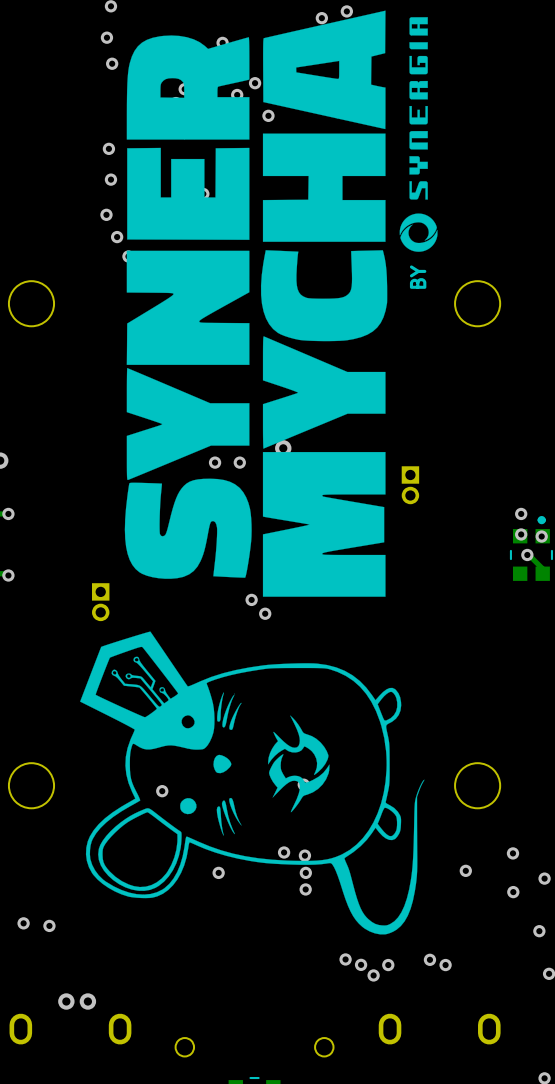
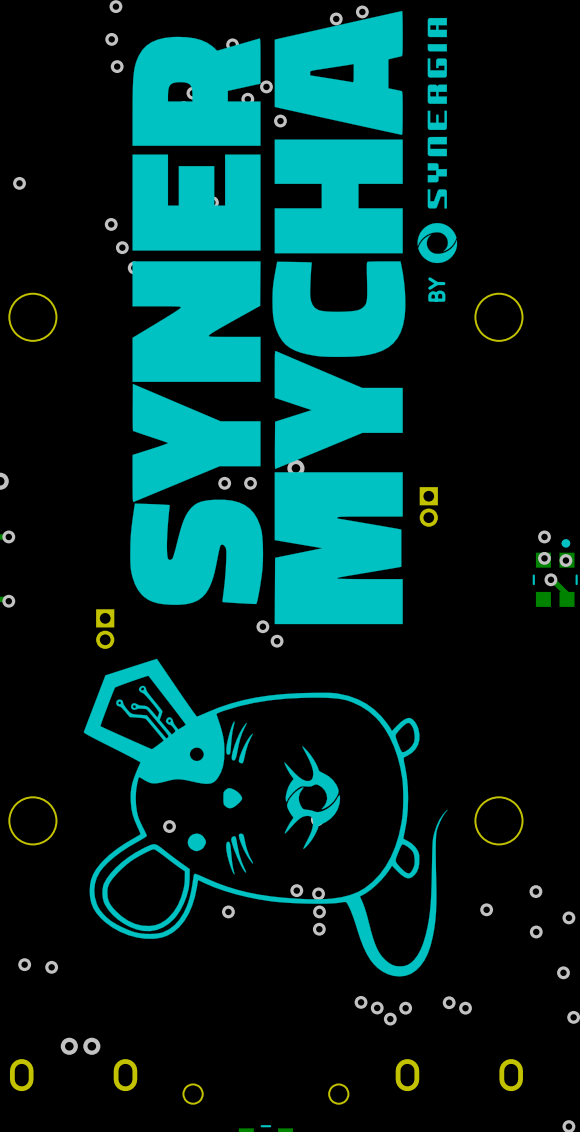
drawing shape: [80, 10, 425, 935] -> [83, 10, 448, 977]
via: (108, 148) -> none
via: none -> (19, 183)
via: (110, 179) -> none

